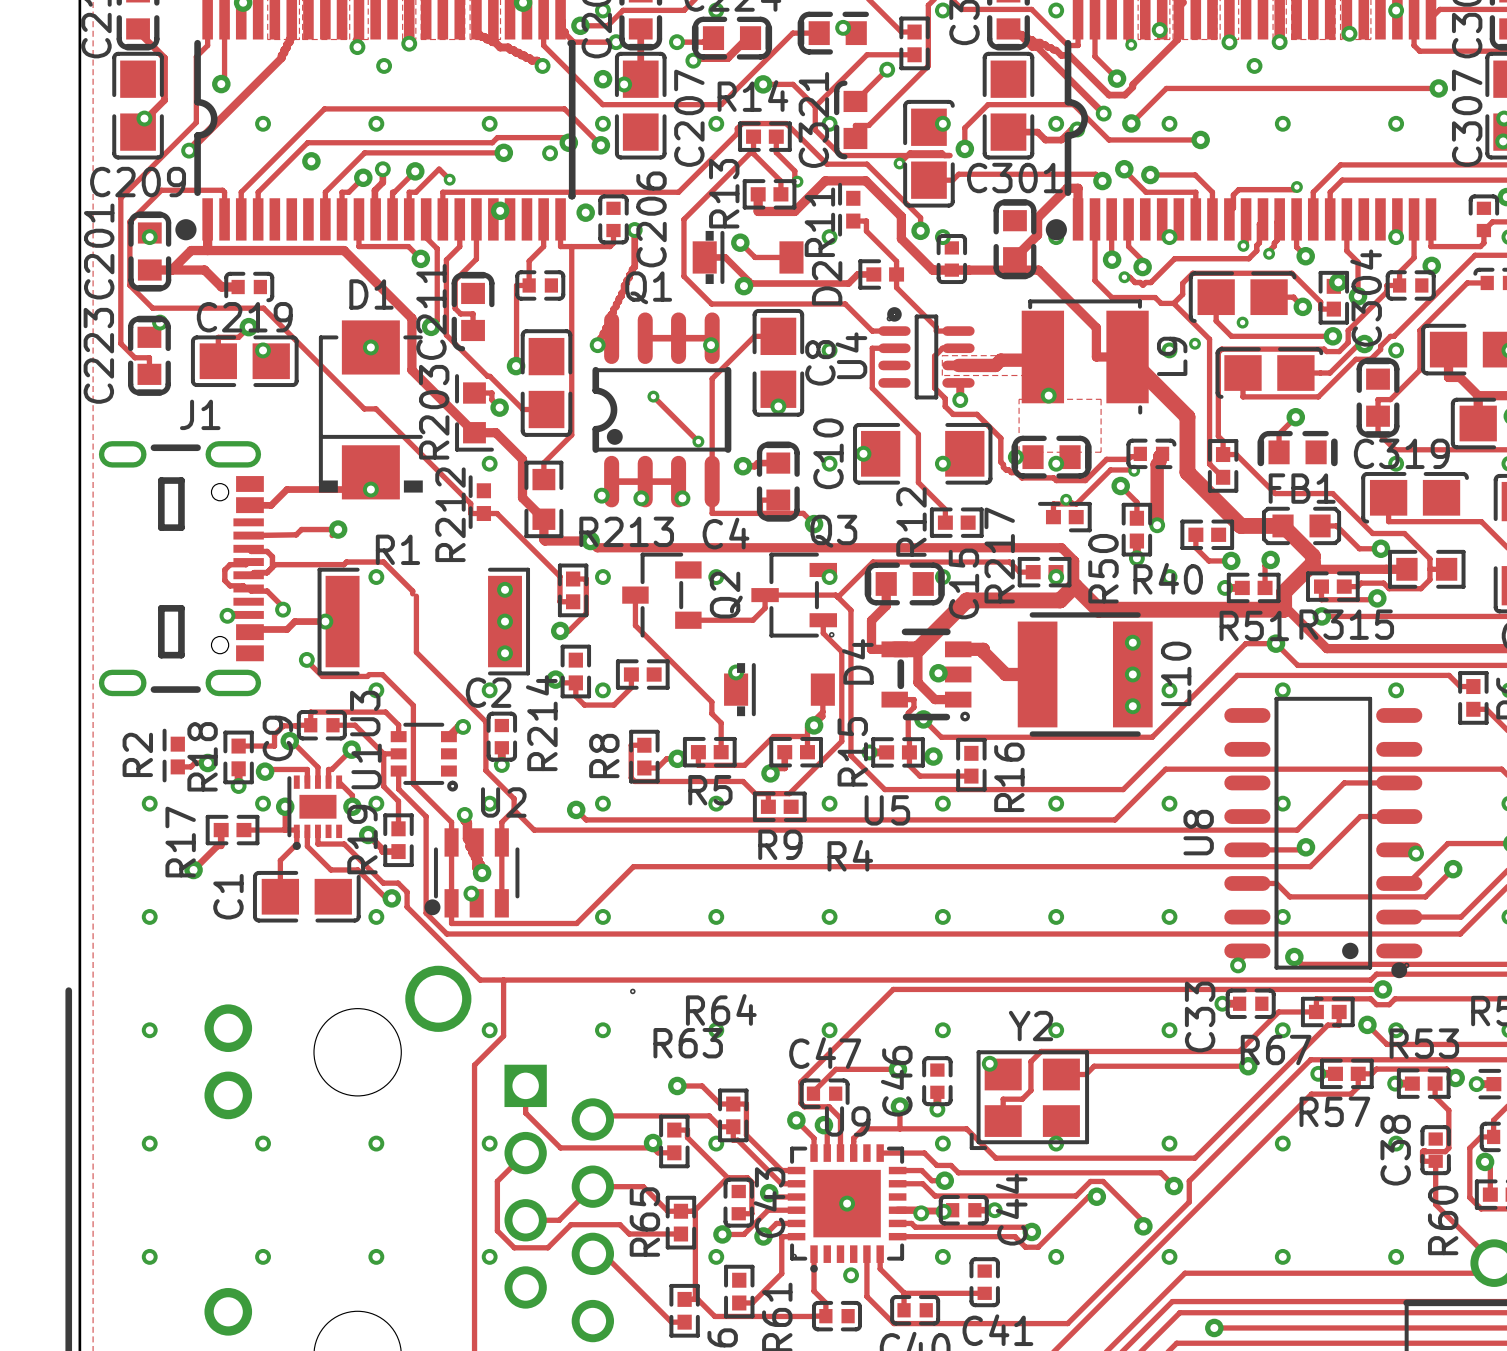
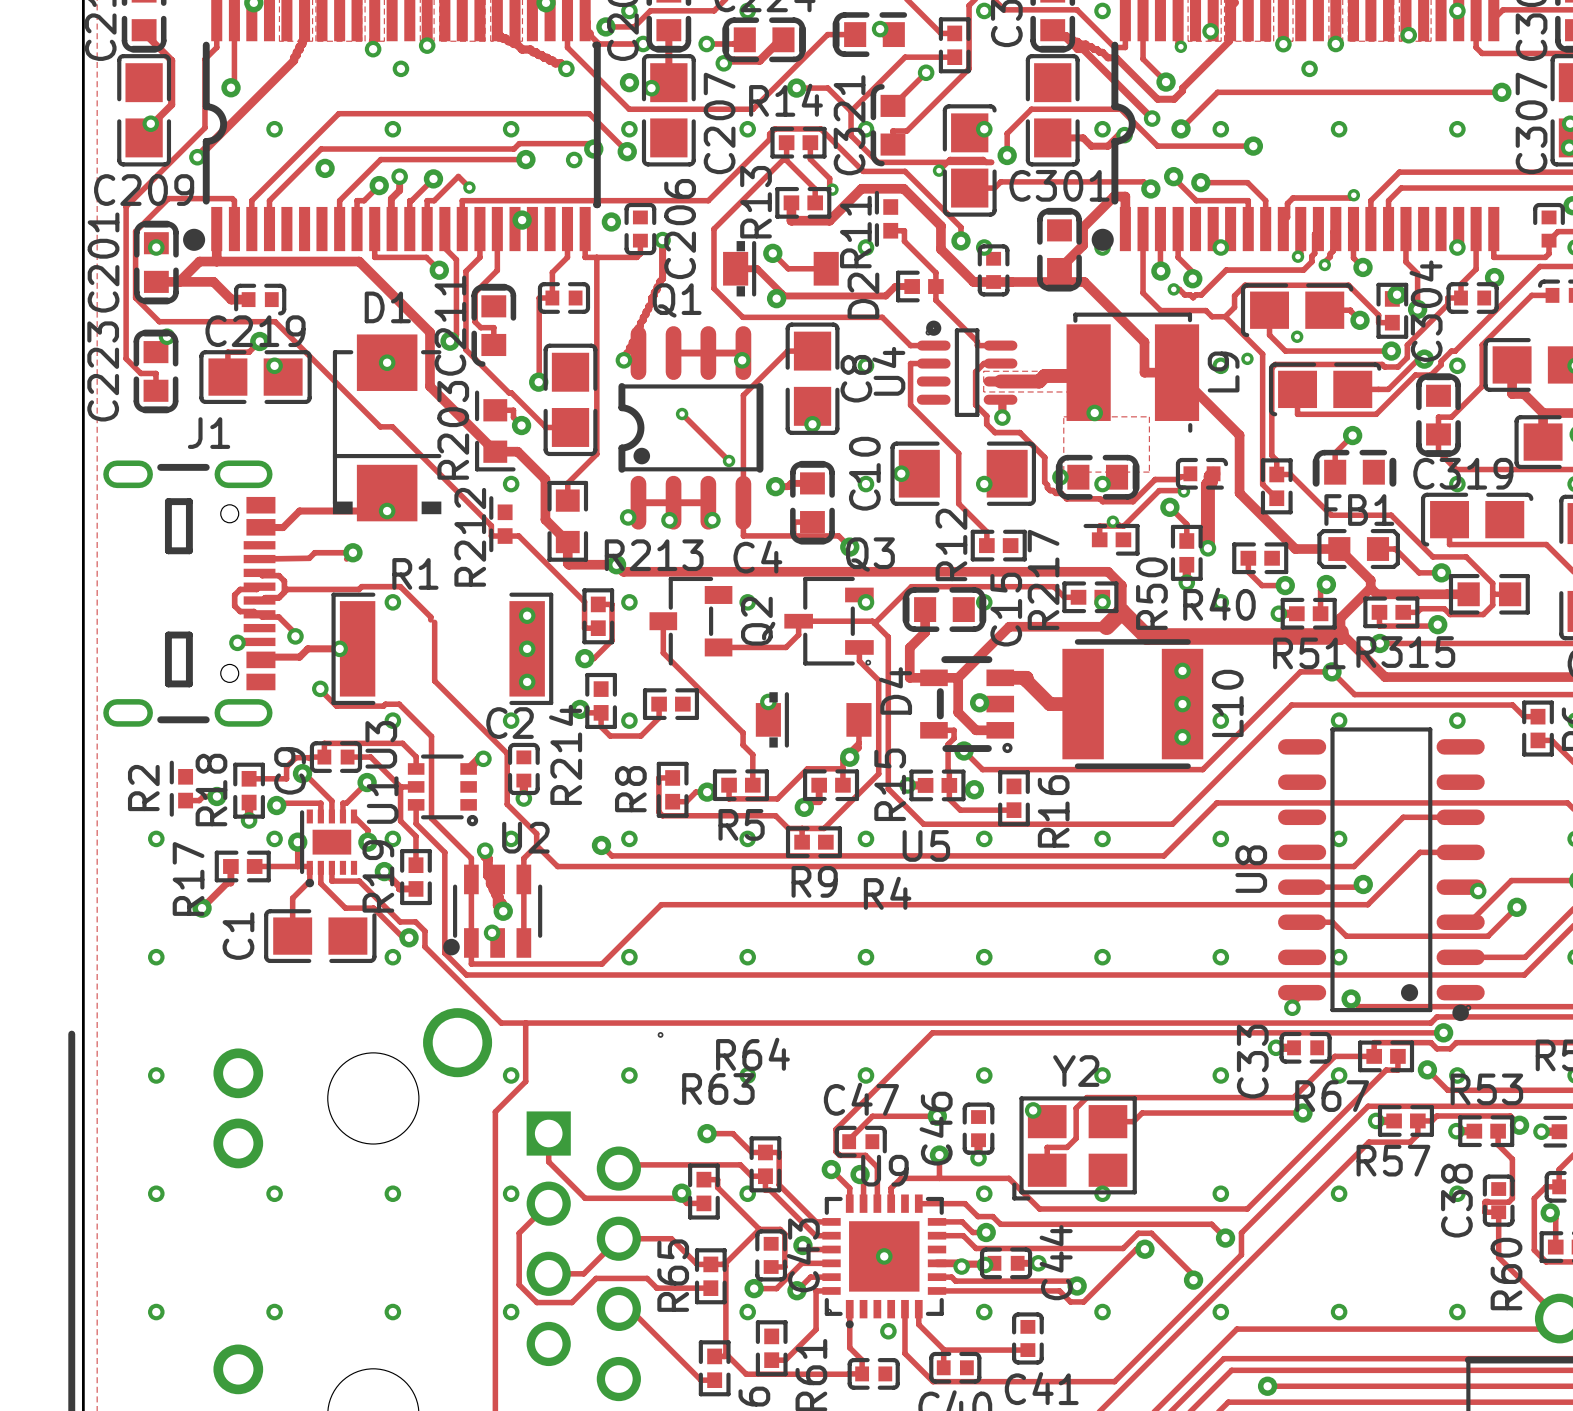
track width: thick (1127, 356) (1187, 416) (1187, 472) (1240, 525) (1283, 525) (1313, 556) (1313, 563) (1284, 592) (1284, 609) -> thin (1177, 372) (1239, 435) (1239, 493) (1295, 549) (1339, 549) (1370, 580) (1370, 587) (1340, 618) (1340, 636)
track width: thick (1060, 600) (966, 600) (917, 649) (894, 649) -> thin (1106, 626) (1009, 626) (958, 677) (933, 677)

